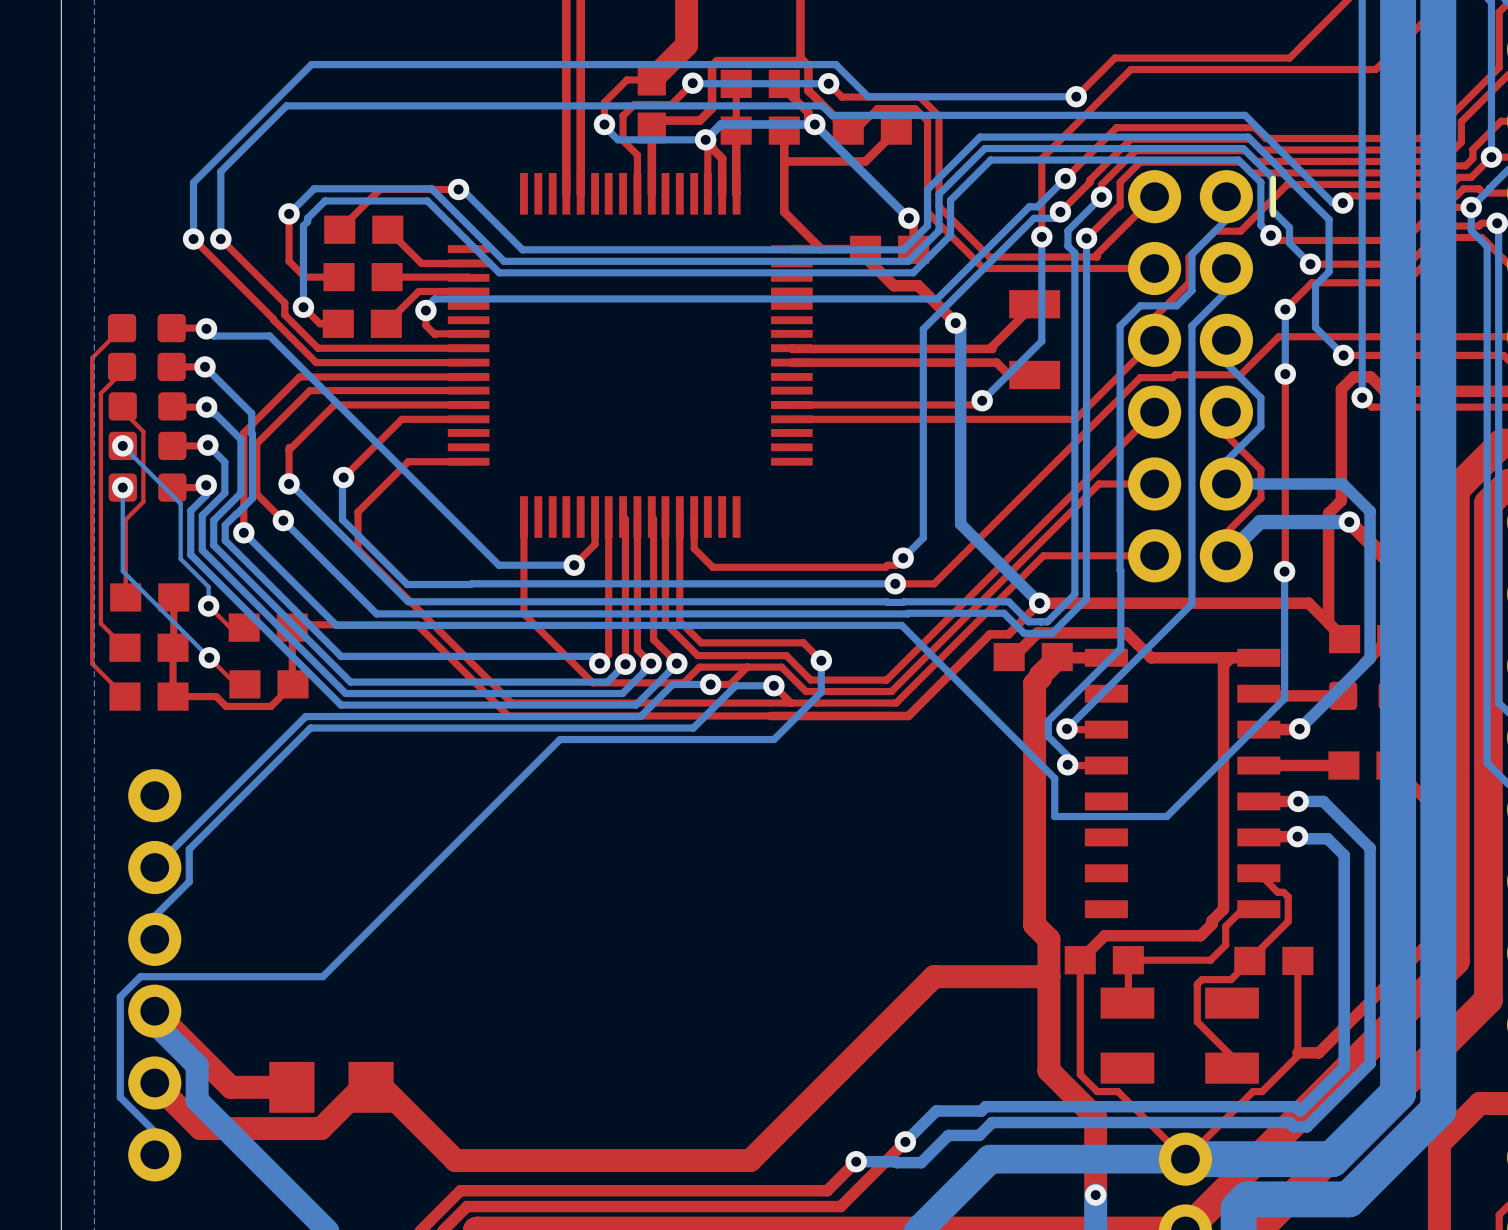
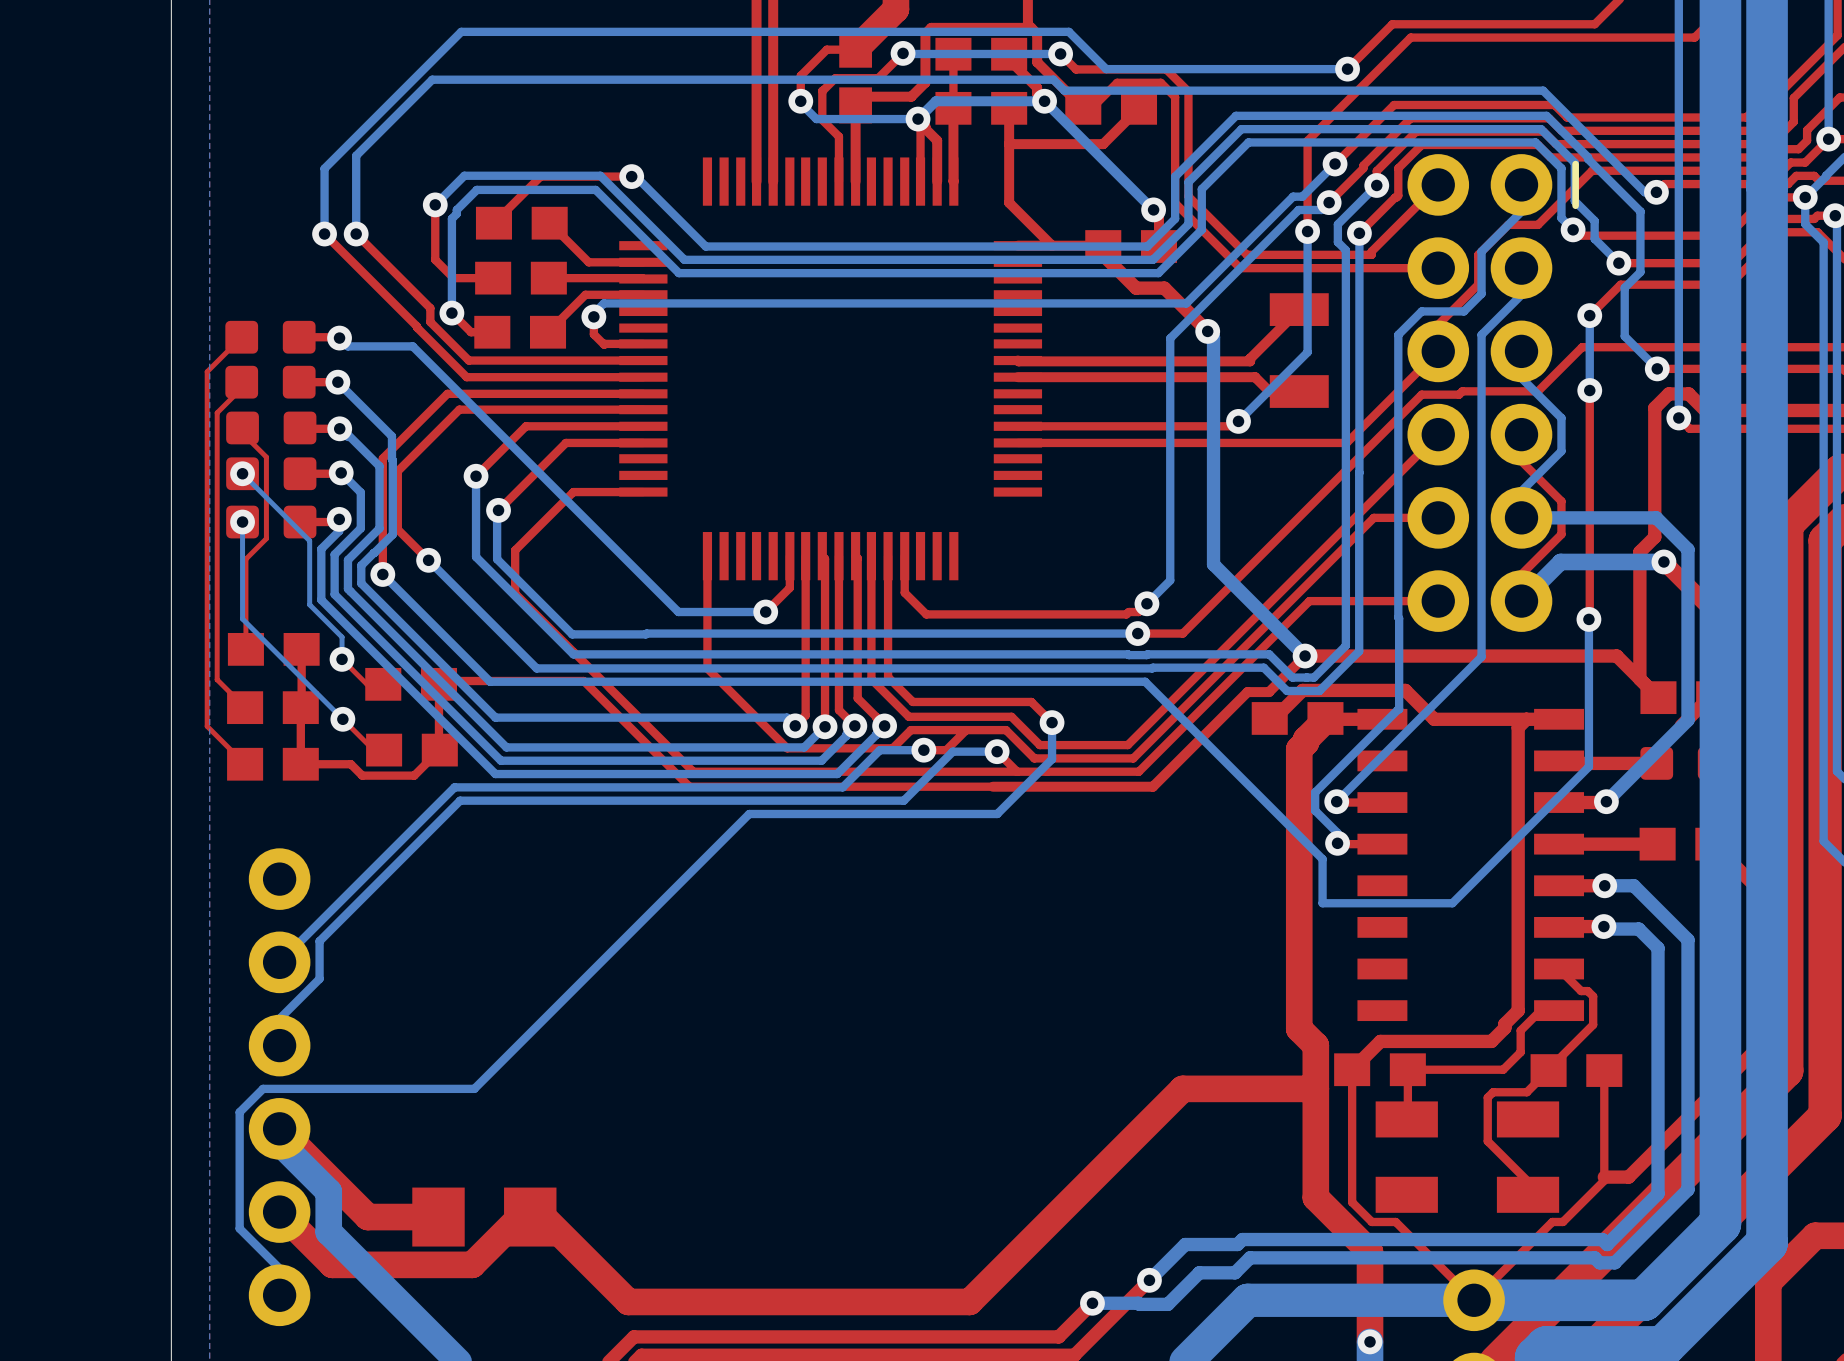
top track: (367, 404) (334, 404) (289, 450) -> (525, 426) (476, 476)
top track: (289, 447) (289, 483) -> none
bottom track: (289, 483) (324, 517) -> (476, 476) (476, 556)
via position: (289, 483) -> (476, 476)

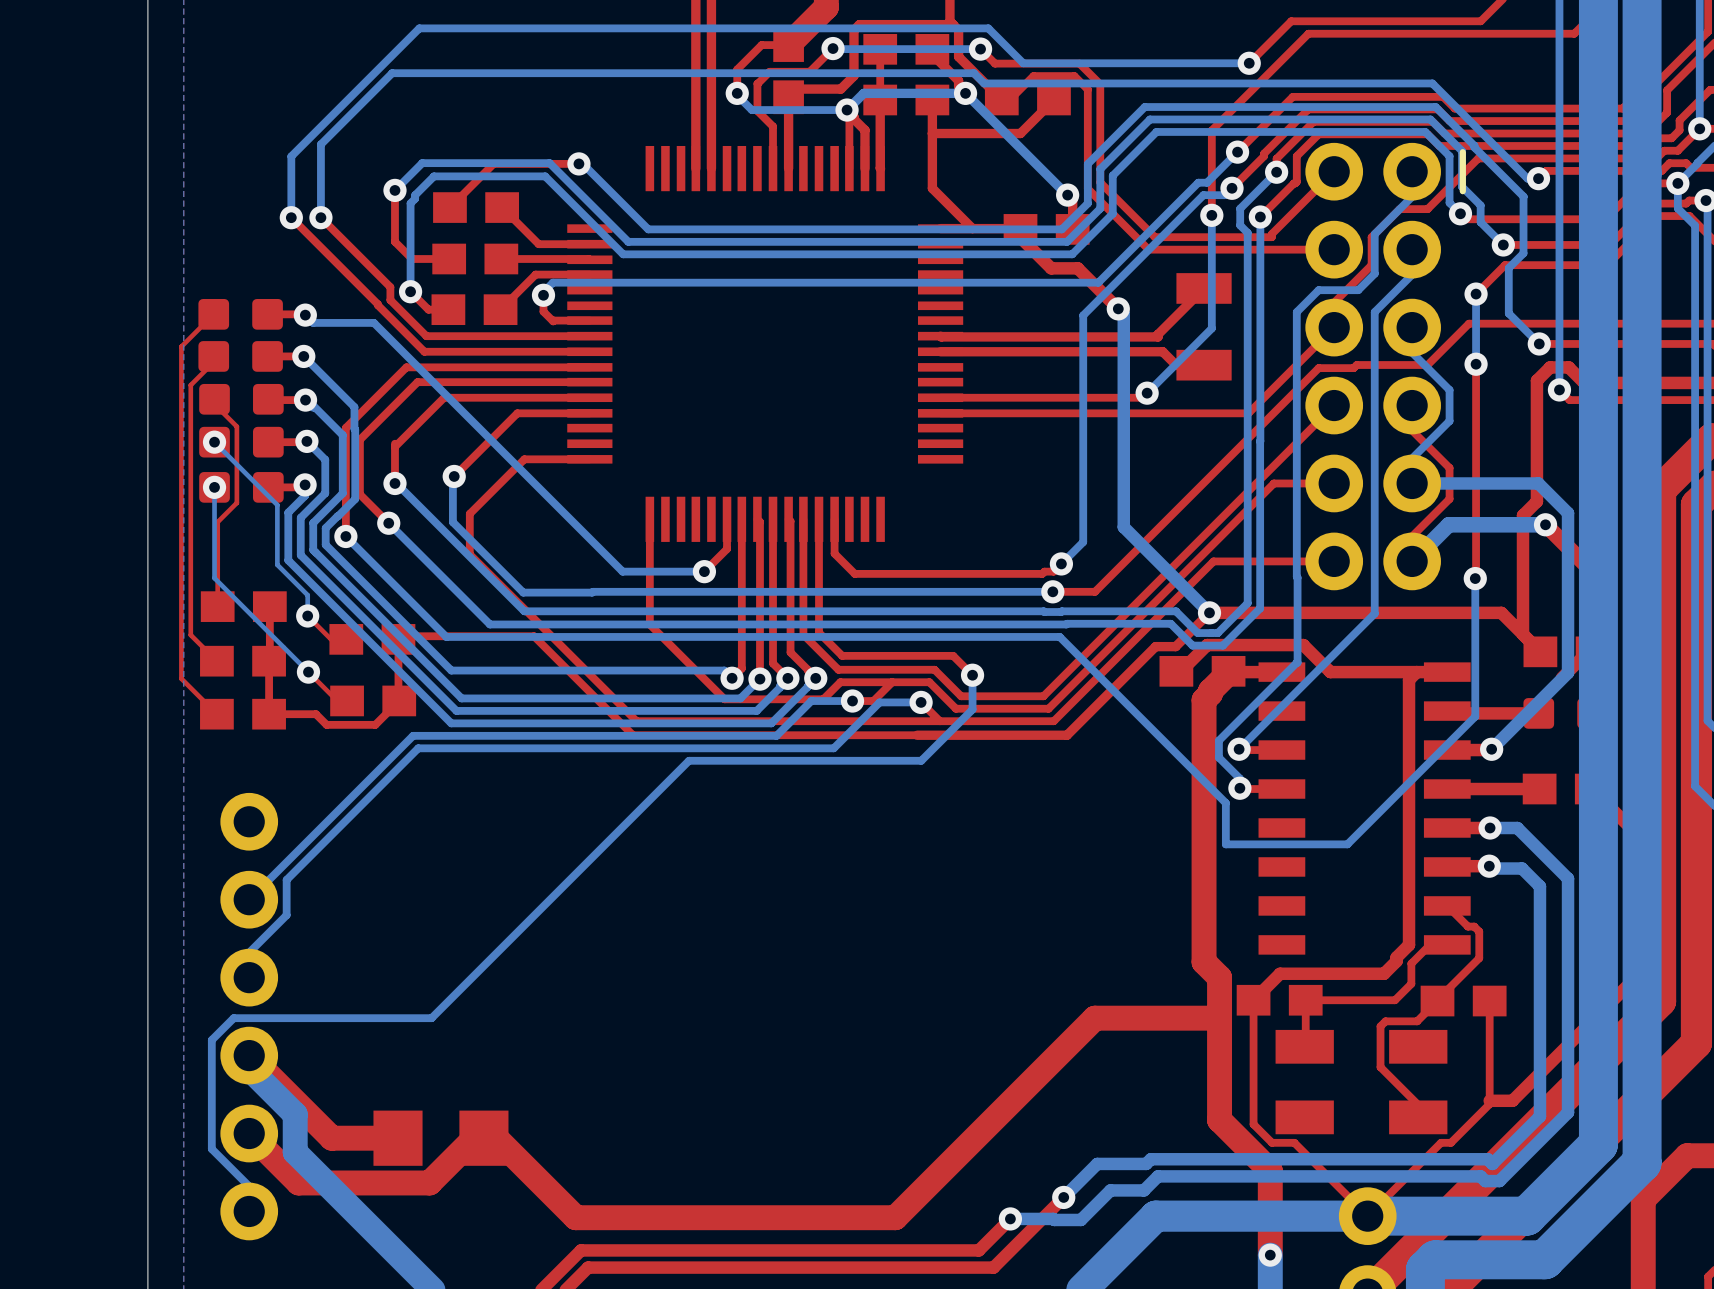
top track: (525, 426) (476, 476) -> (479, 397) (444, 397) (394, 446)
top track: none -> (394, 443) (394, 483)
bottom track: (476, 476) (476, 556) -> (394, 483) (433, 520)
via position: (476, 476) -> (394, 483)

